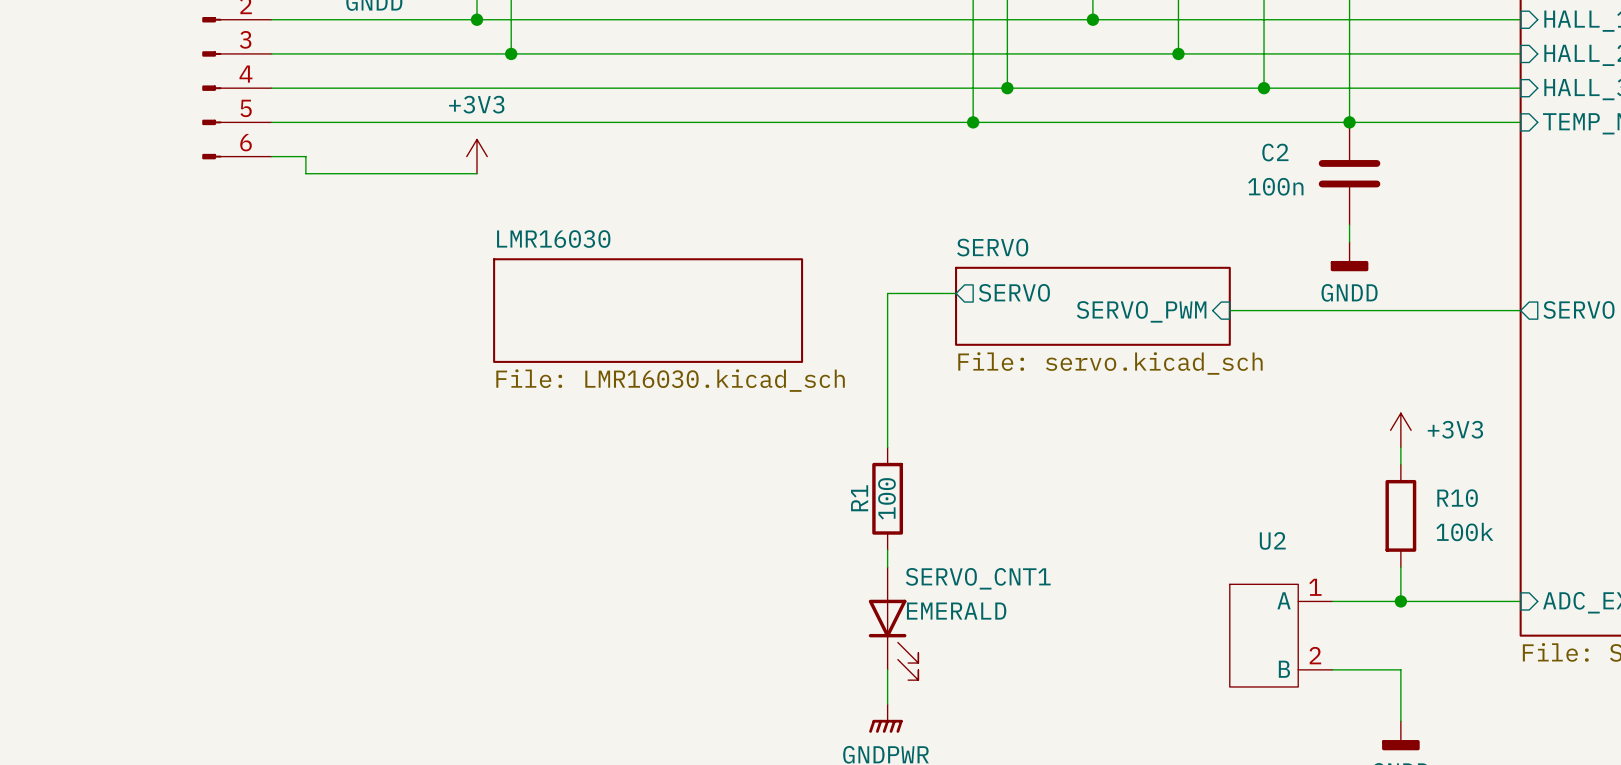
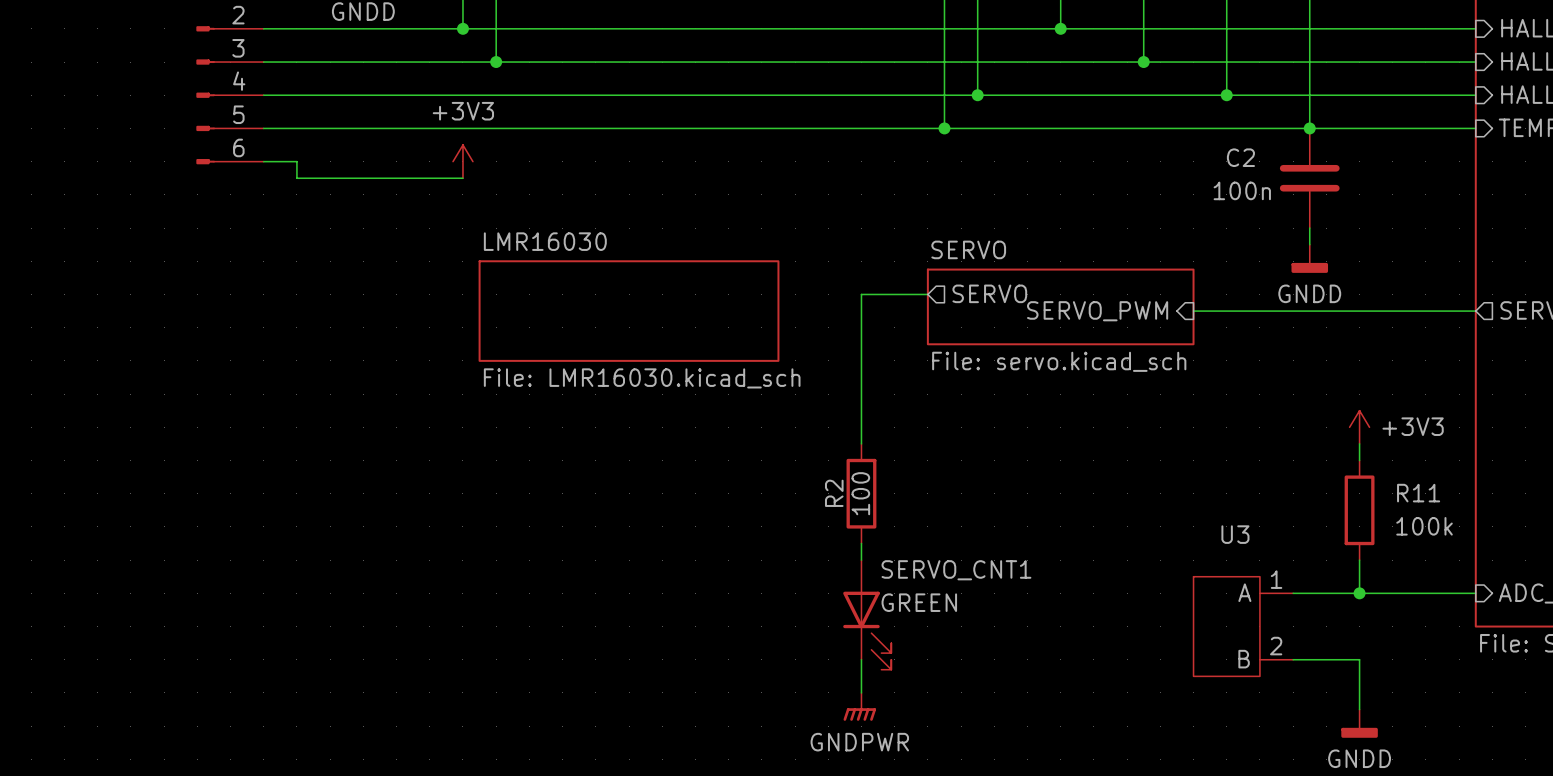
R1 name: R1 (859, 498) -> R2 (834, 493)
R10 name: R10 (1457, 498) -> R11 (1418, 493)
U2 name: U2 (1272, 540) -> U3 (1235, 534)
SERVO_CNT1 value: EMERALD (956, 611) -> GREEN (919, 602)

